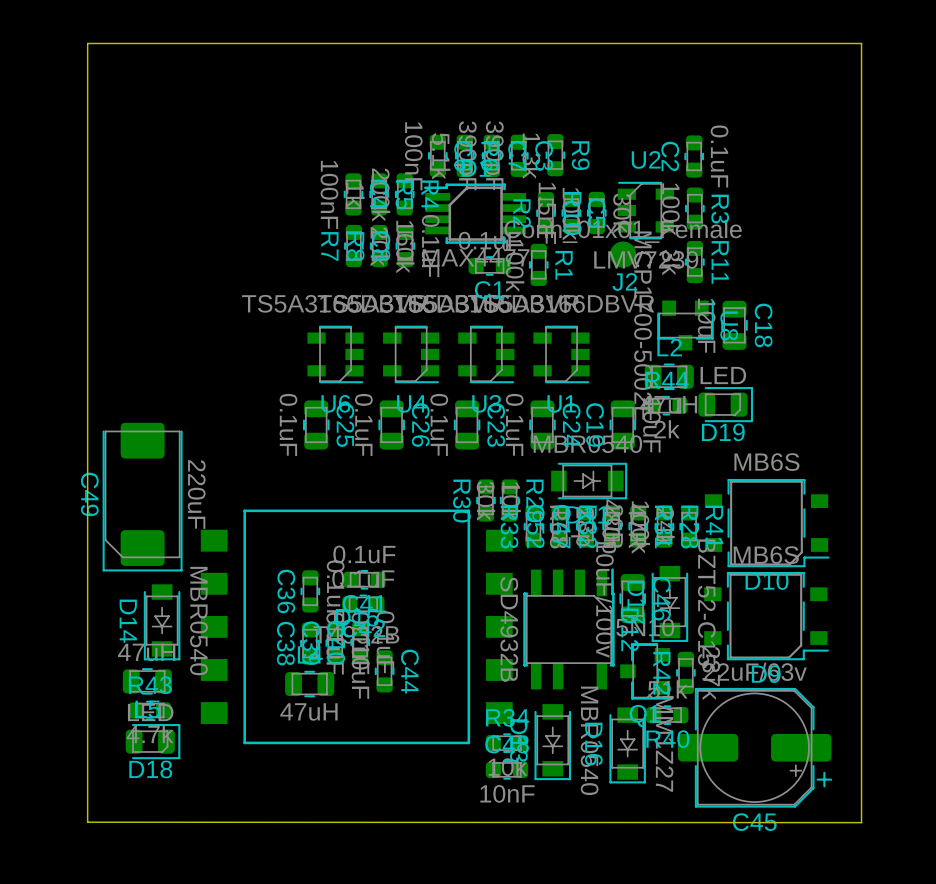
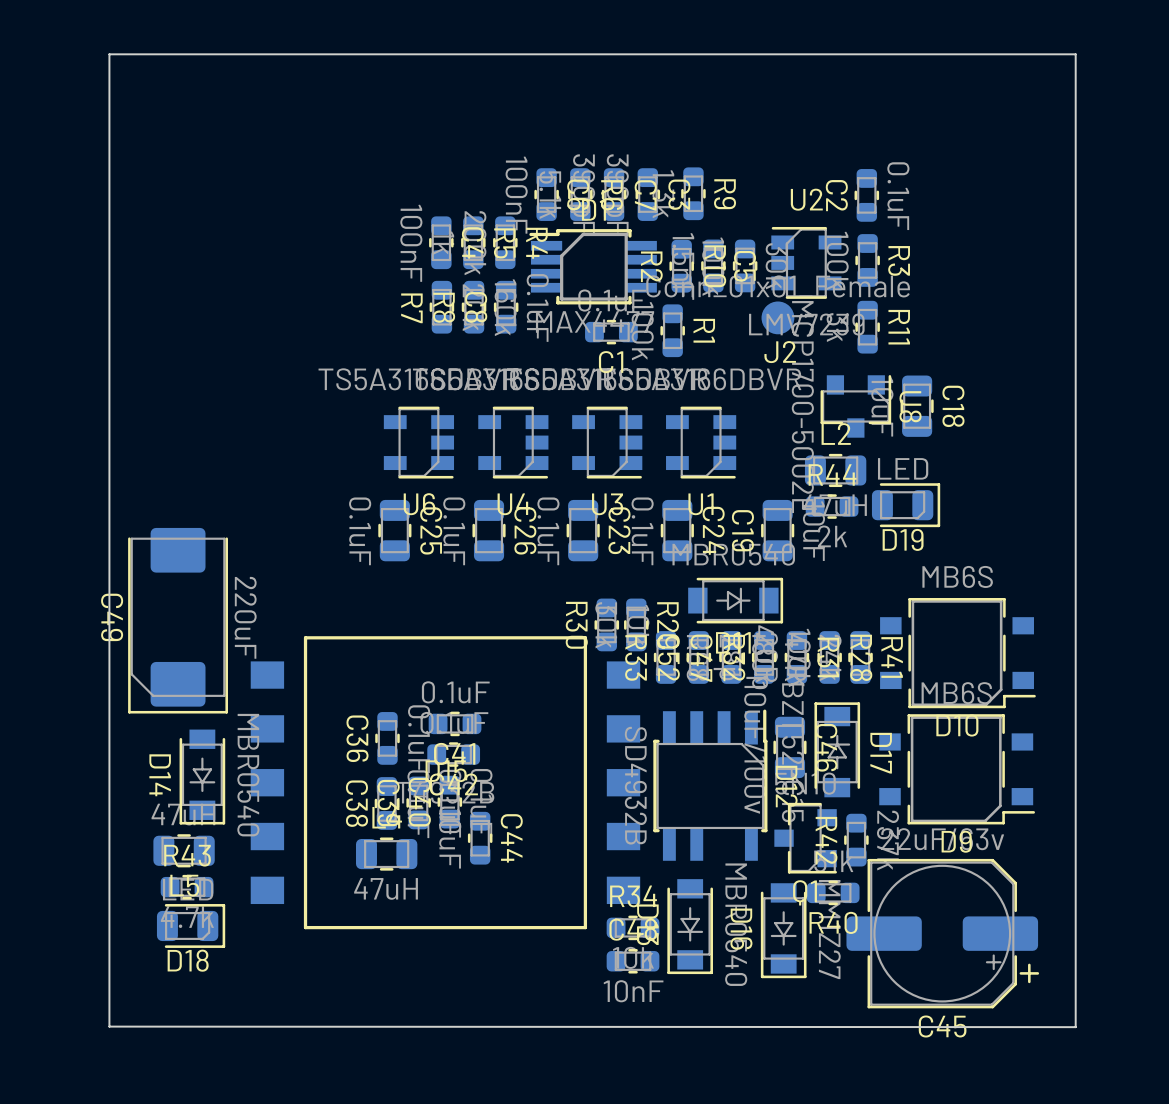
D17 rotation: 0° (669, 603) -> 180° (837, 749)

